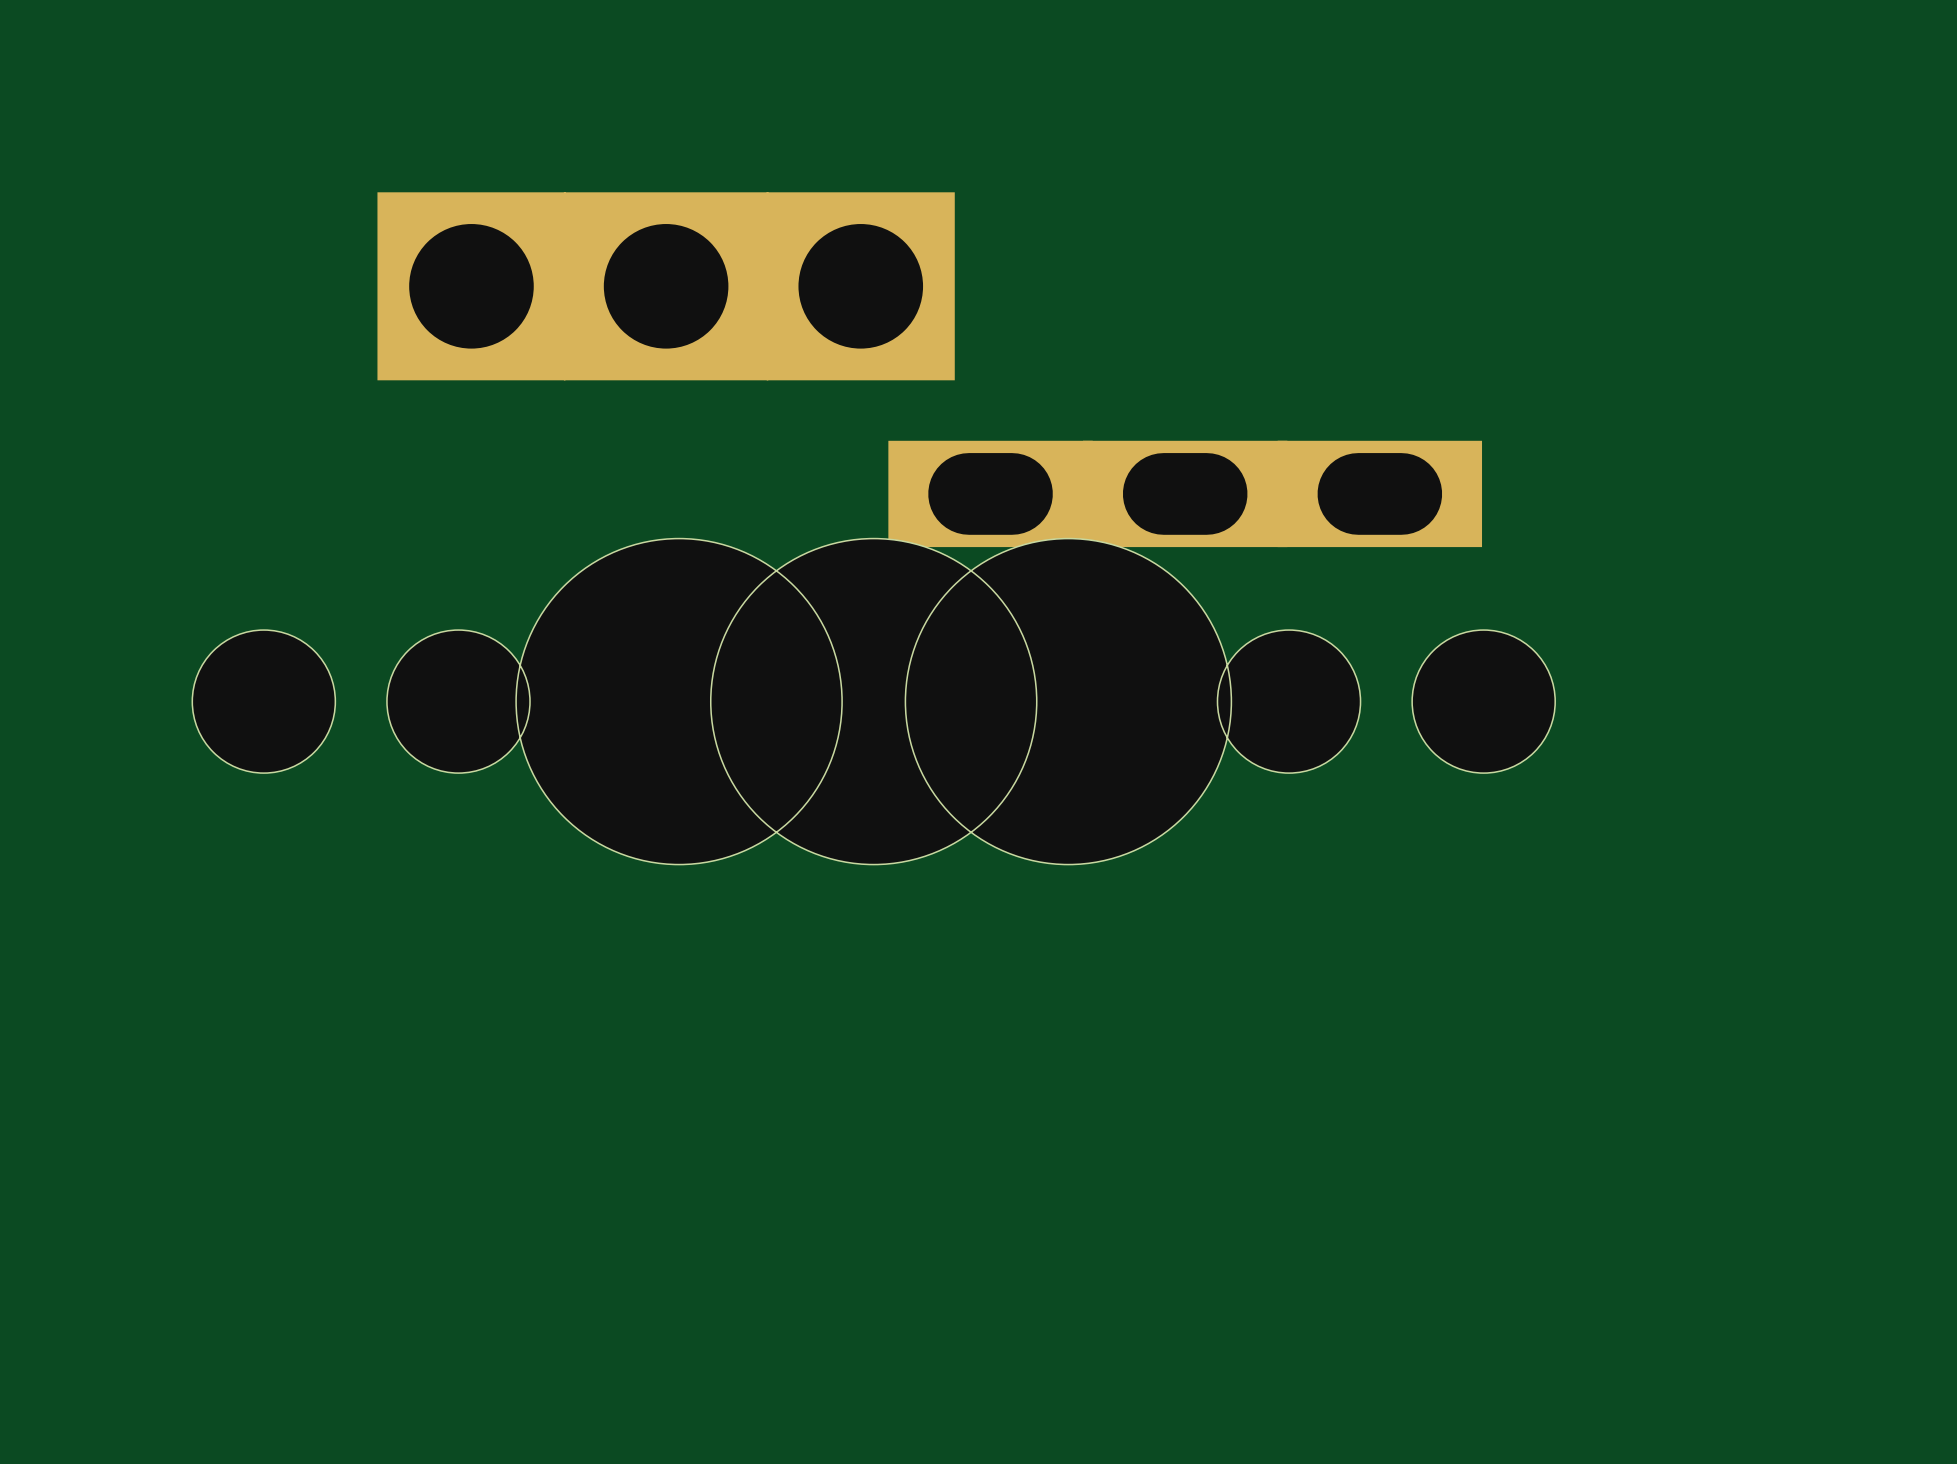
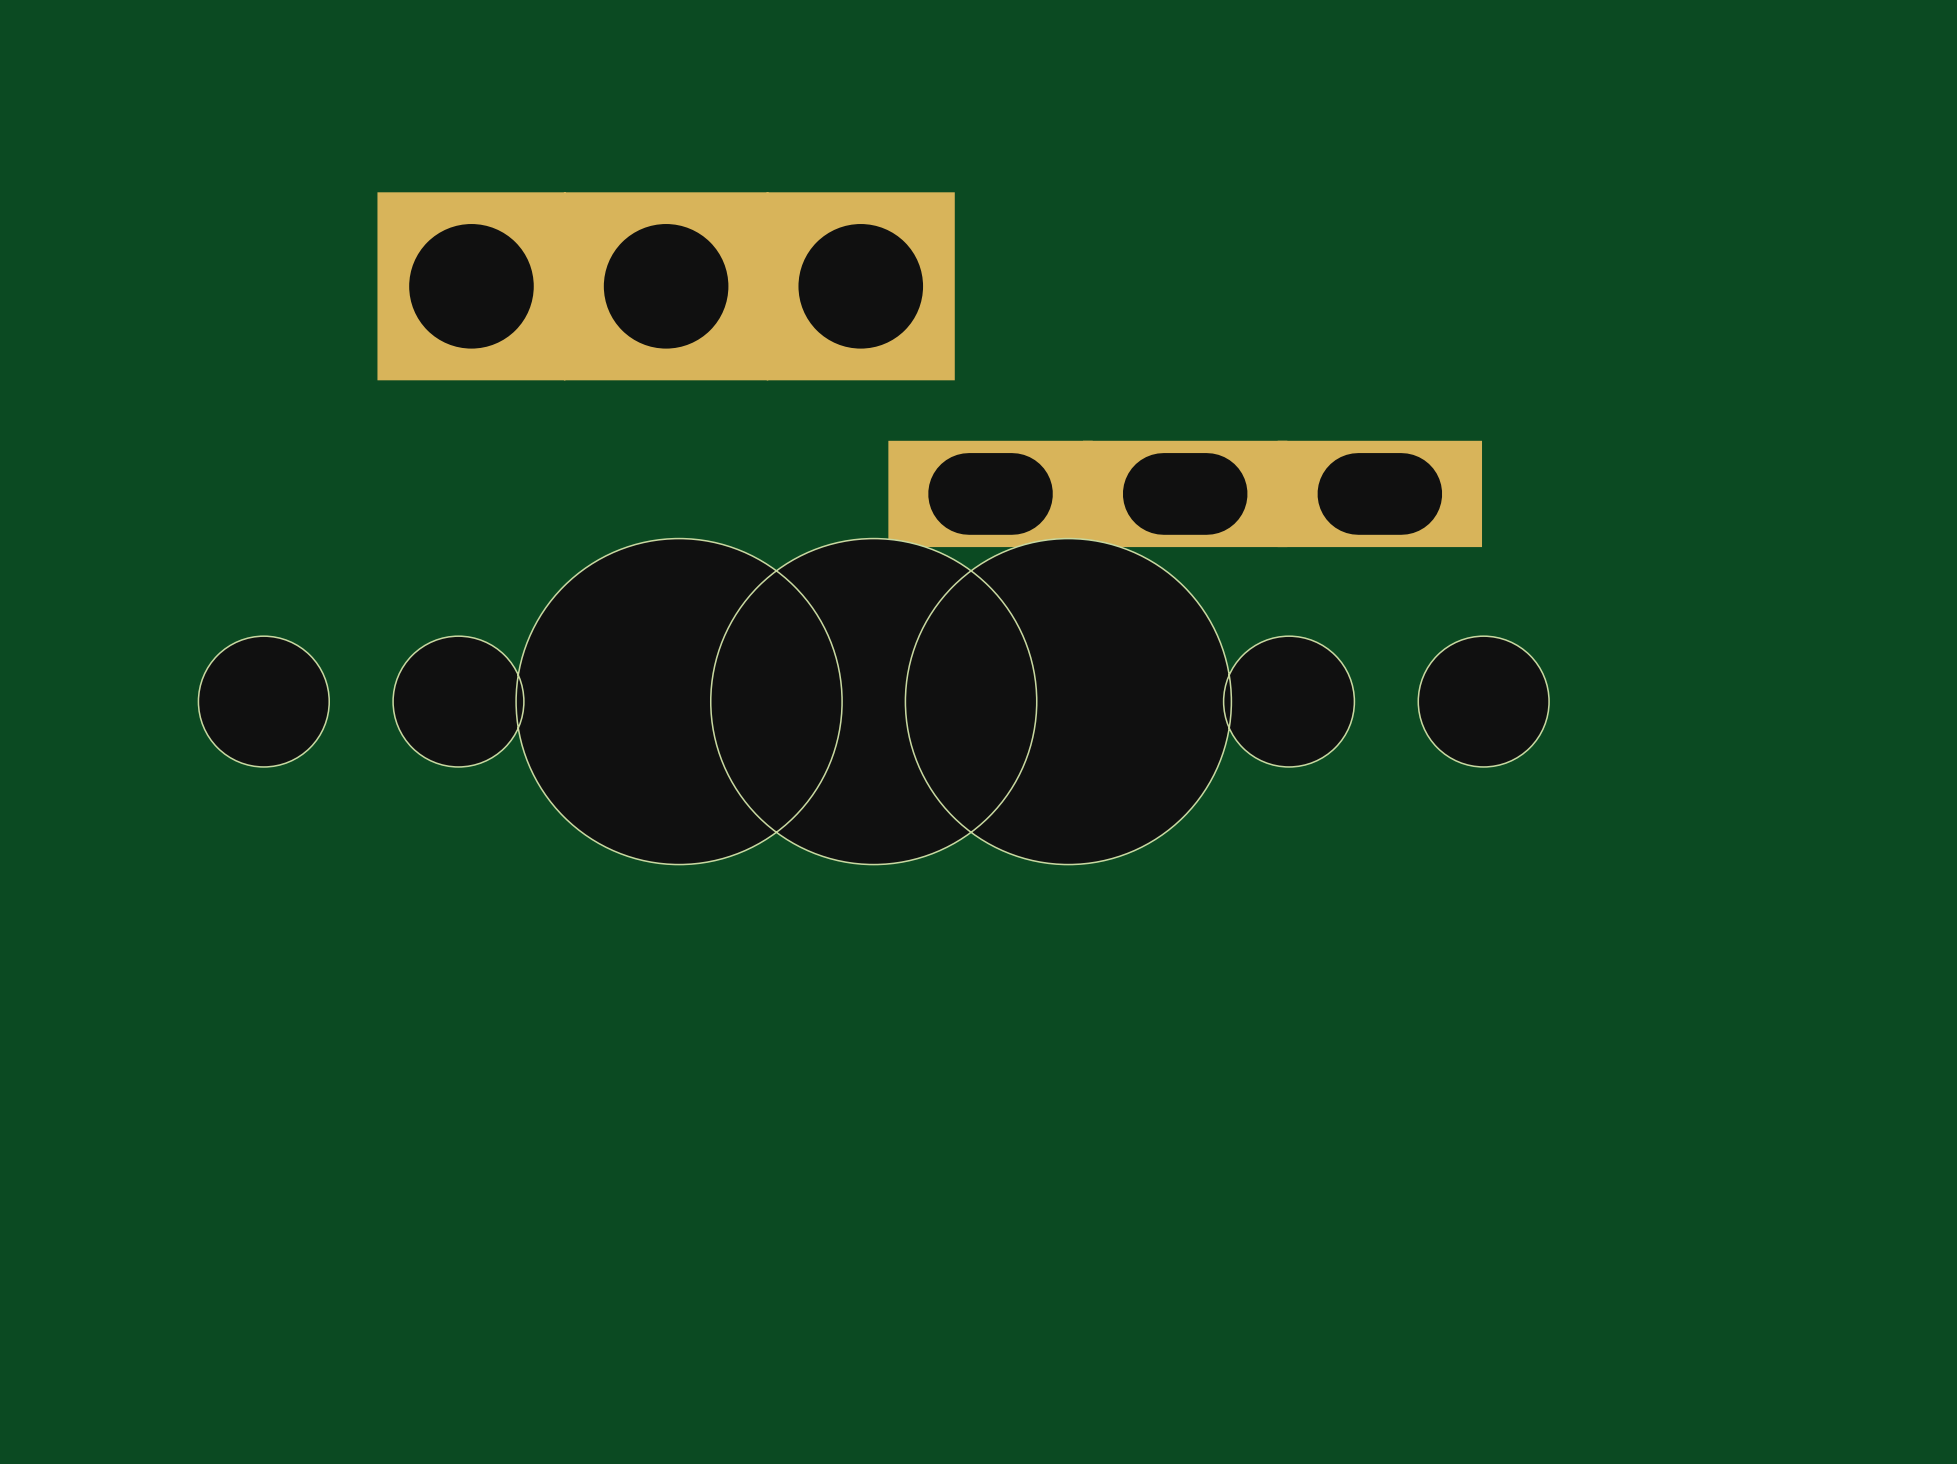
part footprint: [192, 192, 1093, 865] -> [198, 192, 1093, 865]
part footprint: [386, 192, 1361, 865] -> [393, 192, 1355, 865]
part footprint: [766, 192, 1556, 865] -> [766, 192, 1550, 865]

